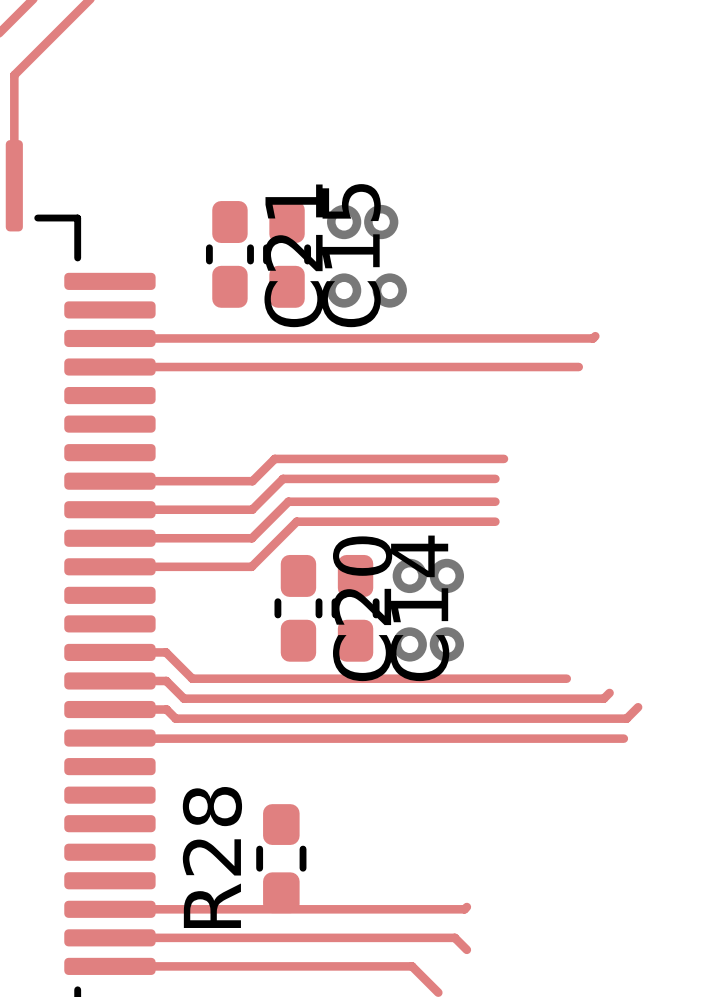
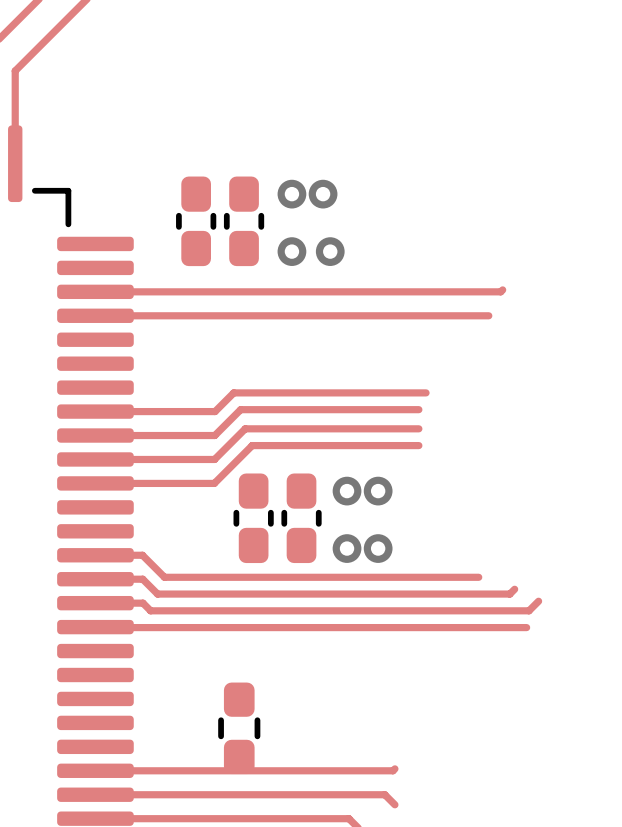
C21 name: C21 (294, 255) -> none
C15 name: C15 (351, 255) -> none
C20 name: C20 (362, 608) -> none
C14 name: C14 (419, 608) -> none
R28 name: R28 (212, 857) -> none

